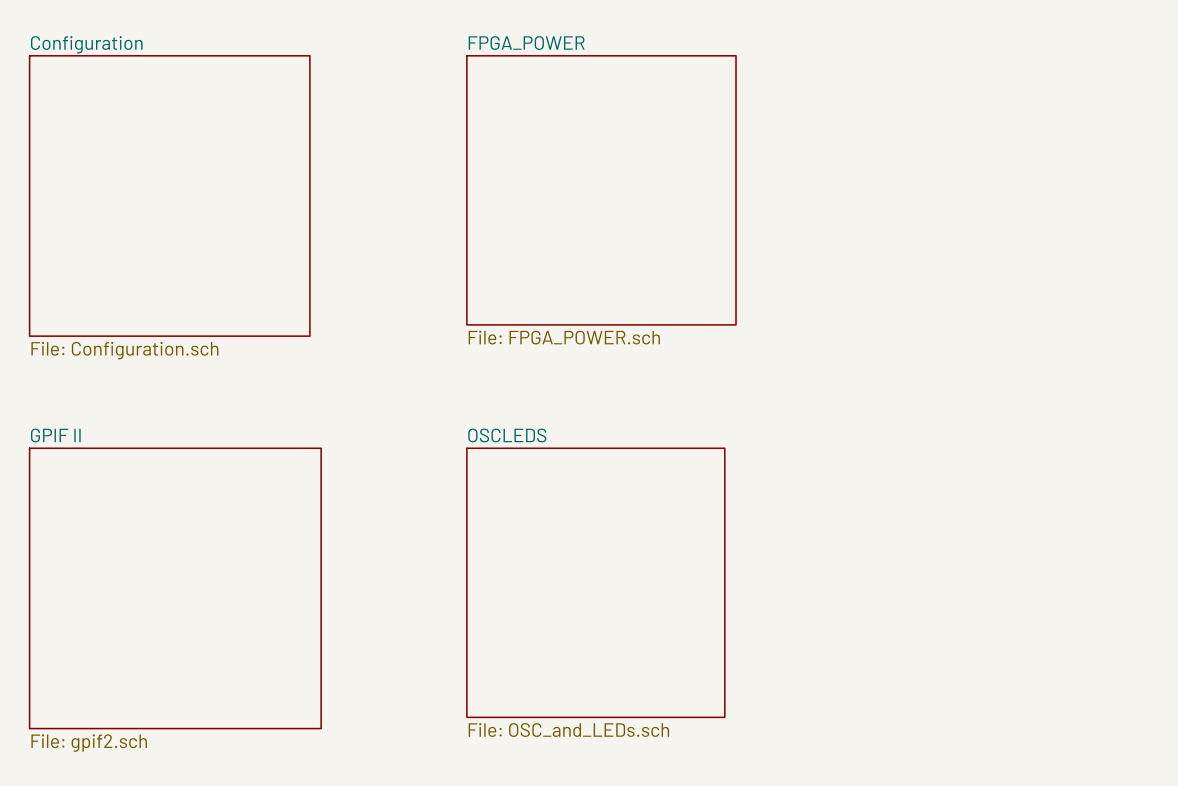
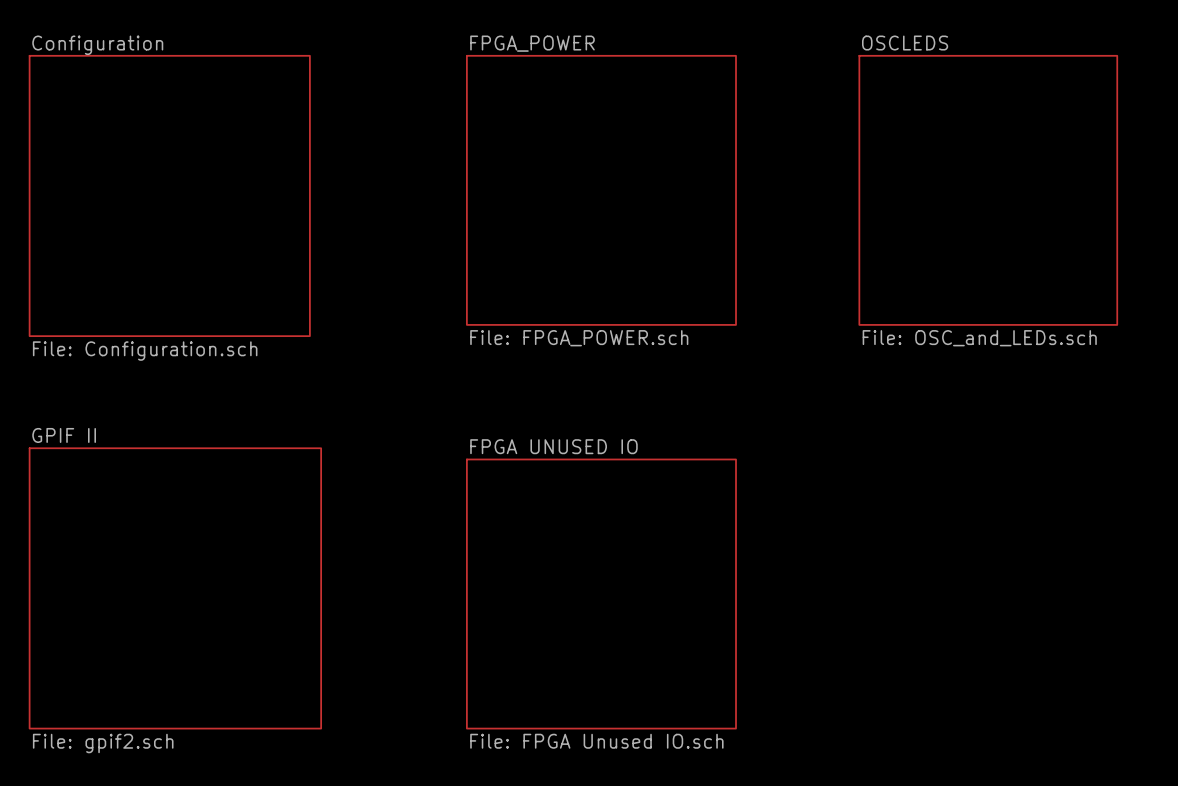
sheet OSCLEDS: none -> File: OSC_and_LEDs.sch (988, 190)
sheet OSCLEDS: File: OSC_and_LEDs.sch (595, 582) -> none
sheet FPGA UNUSED IO: none -> File: FPGA Unused IO.sch (601, 594)

